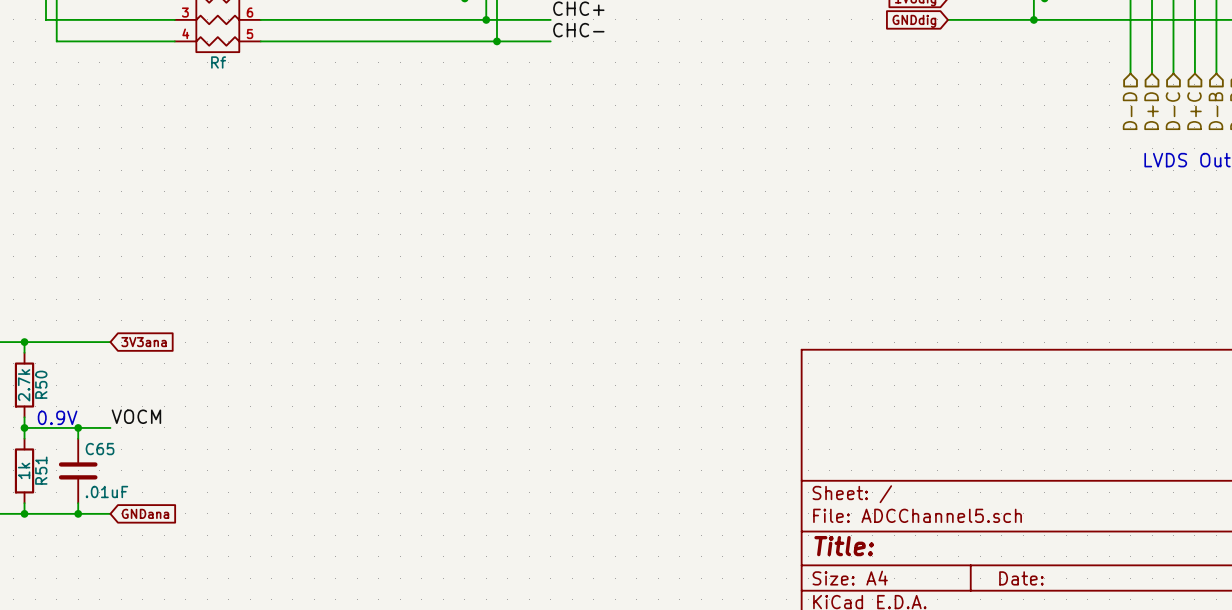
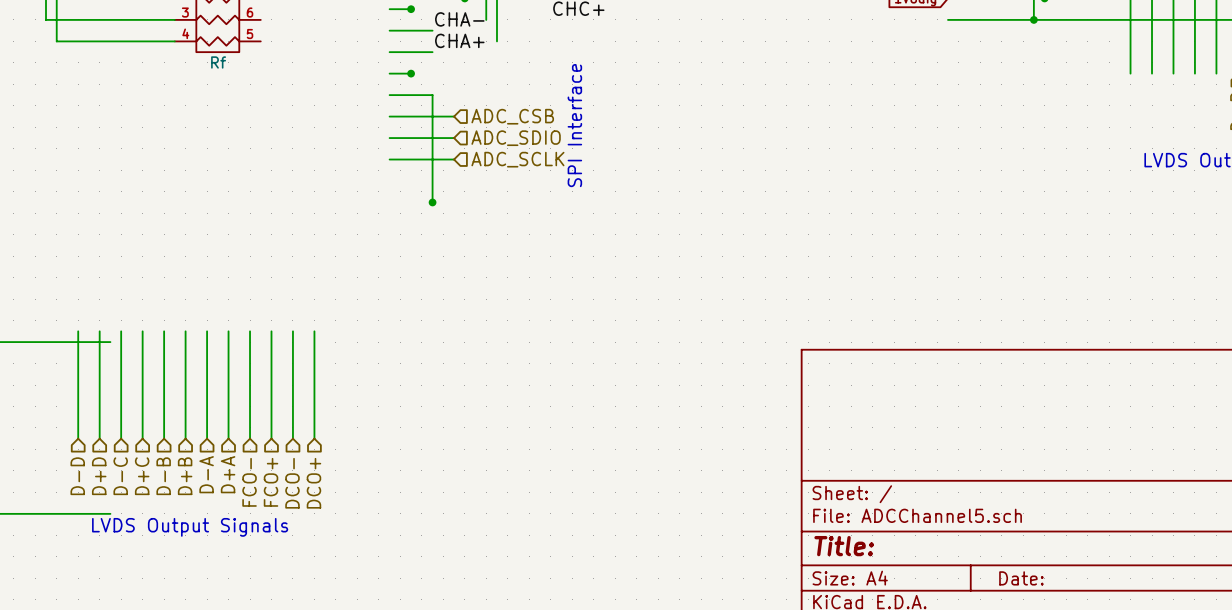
wire: none -> (389, 9) (411, 9)
junction: none -> (411, 9)
wire: (260, 19) (550, 19) -> none
label: none -> CHA- (459, 19)
junction: (486, 19) -> none
global label: GNDdig (914, 21) -> none
wire: none -> (389, 30) (432, 30)
label: CHC- (578, 30) -> none
label: none -> CHA+ (459, 40)
wire: (260, 41) (550, 41) -> none
junction: (496, 41) -> none
wire: none -> (389, 52) (432, 52)
wire: none -> (389, 73) (411, 73)
junction: none -> (411, 73)
wire: none -> (389, 95) (432, 95) (432, 202)
hierarchical label: D-D (1130, 111) -> none
hierarchical label: D+D (1151, 111) -> none
hierarchical label: D-C (1173, 111) -> none
hierarchical label: D+C (1194, 111) -> none
hierarchical label: D-B (1215, 111) -> none
wire: none -> (389, 116) (454, 116)
hierarchical label: none -> ADC_CSB (512, 116)
text: none -> SPI Interface (574, 125)
wire: none -> (389, 138) (454, 138)
hierarchical label: none -> ADC_SDIO (516, 138)
wire: none -> (389, 159) (454, 159)
hierarchical label: none -> ADC_SCLK (517, 159)
junction: none -> (432, 202)
wire: none -> (78, 331) (78, 427)
wire: none -> (99, 331) (99, 438)
wire: none -> (121, 331) (121, 438)
wire: none -> (142, 331) (142, 438)
wire: none -> (164, 331) (164, 438)
wire: none -> (185, 331) (185, 438)
wire: none -> (207, 331) (207, 438)
wire: none -> (228, 331) (228, 438)
wire: none -> (250, 331) (250, 438)
wire: none -> (271, 331) (271, 438)
wire: none -> (292, 331) (292, 438)
wire: none -> (314, 331) (314, 438)
wire: (24, 342) (24, 352) -> none
junction: (24, 342) -> none
global label: 3V3ana (144, 342) -> none
R50: 2.7k (24, 385) -> none
label: VOCM (136, 416) -> none
wire: (24, 417) (24, 438) -> none
text: 0.9V (57, 417) -> none
wire: (24, 427) (110, 427) -> none
junction: (24, 427) -> none
junction: (78, 427) -> none
R51: 1k (24, 470) -> none
C65: .01uF (78, 470) -> none
hierarchical label: none -> D-A (206, 474)
hierarchical label: none -> D+A (228, 474)
hierarchical label: none -> D-D (77, 476)
hierarchical label: none -> D+D (99, 476)
hierarchical label: none -> D-C (120, 476)
hierarchical label: none -> D+C (142, 476)
hierarchical label: none -> D-B (163, 476)
hierarchical label: none -> D+B (185, 476)
hierarchical label: none -> FCO- (249, 482)
hierarchical label: none -> FCO+ (271, 482)
hierarchical label: none -> DCO- (292, 483)
hierarchical label: none -> DCO+ (313, 483)
wire: (24, 503) (24, 513) -> none
wire: (78, 503) (78, 513) -> none
junction: (24, 513) -> none
junction: (78, 513) -> none
global label: GNDana (145, 513) -> none
text: none -> LVDS Output Signals (190, 527)

